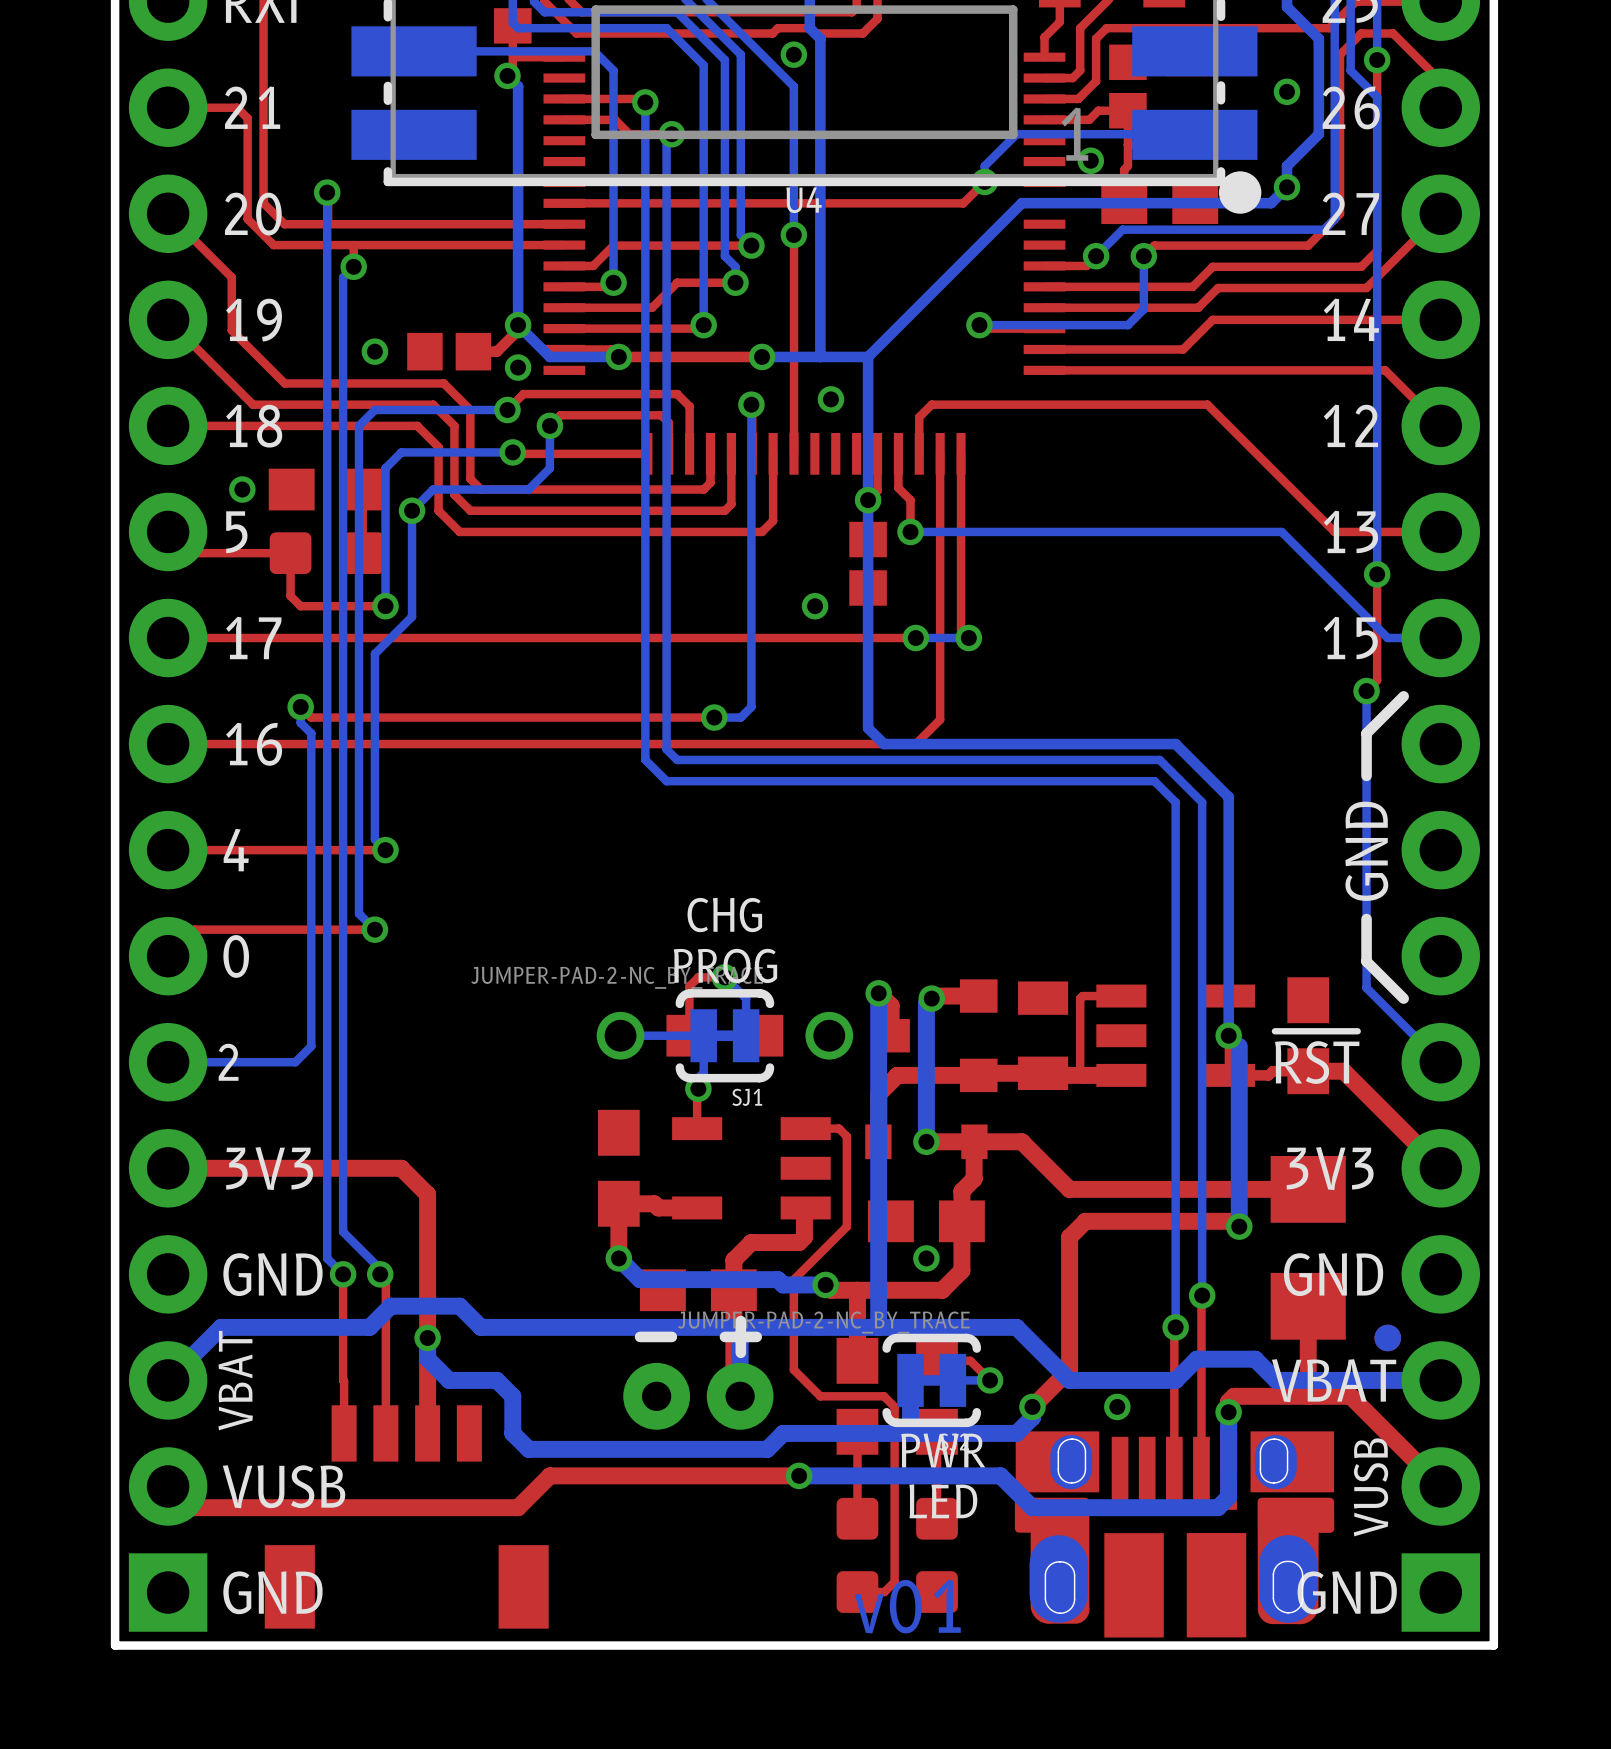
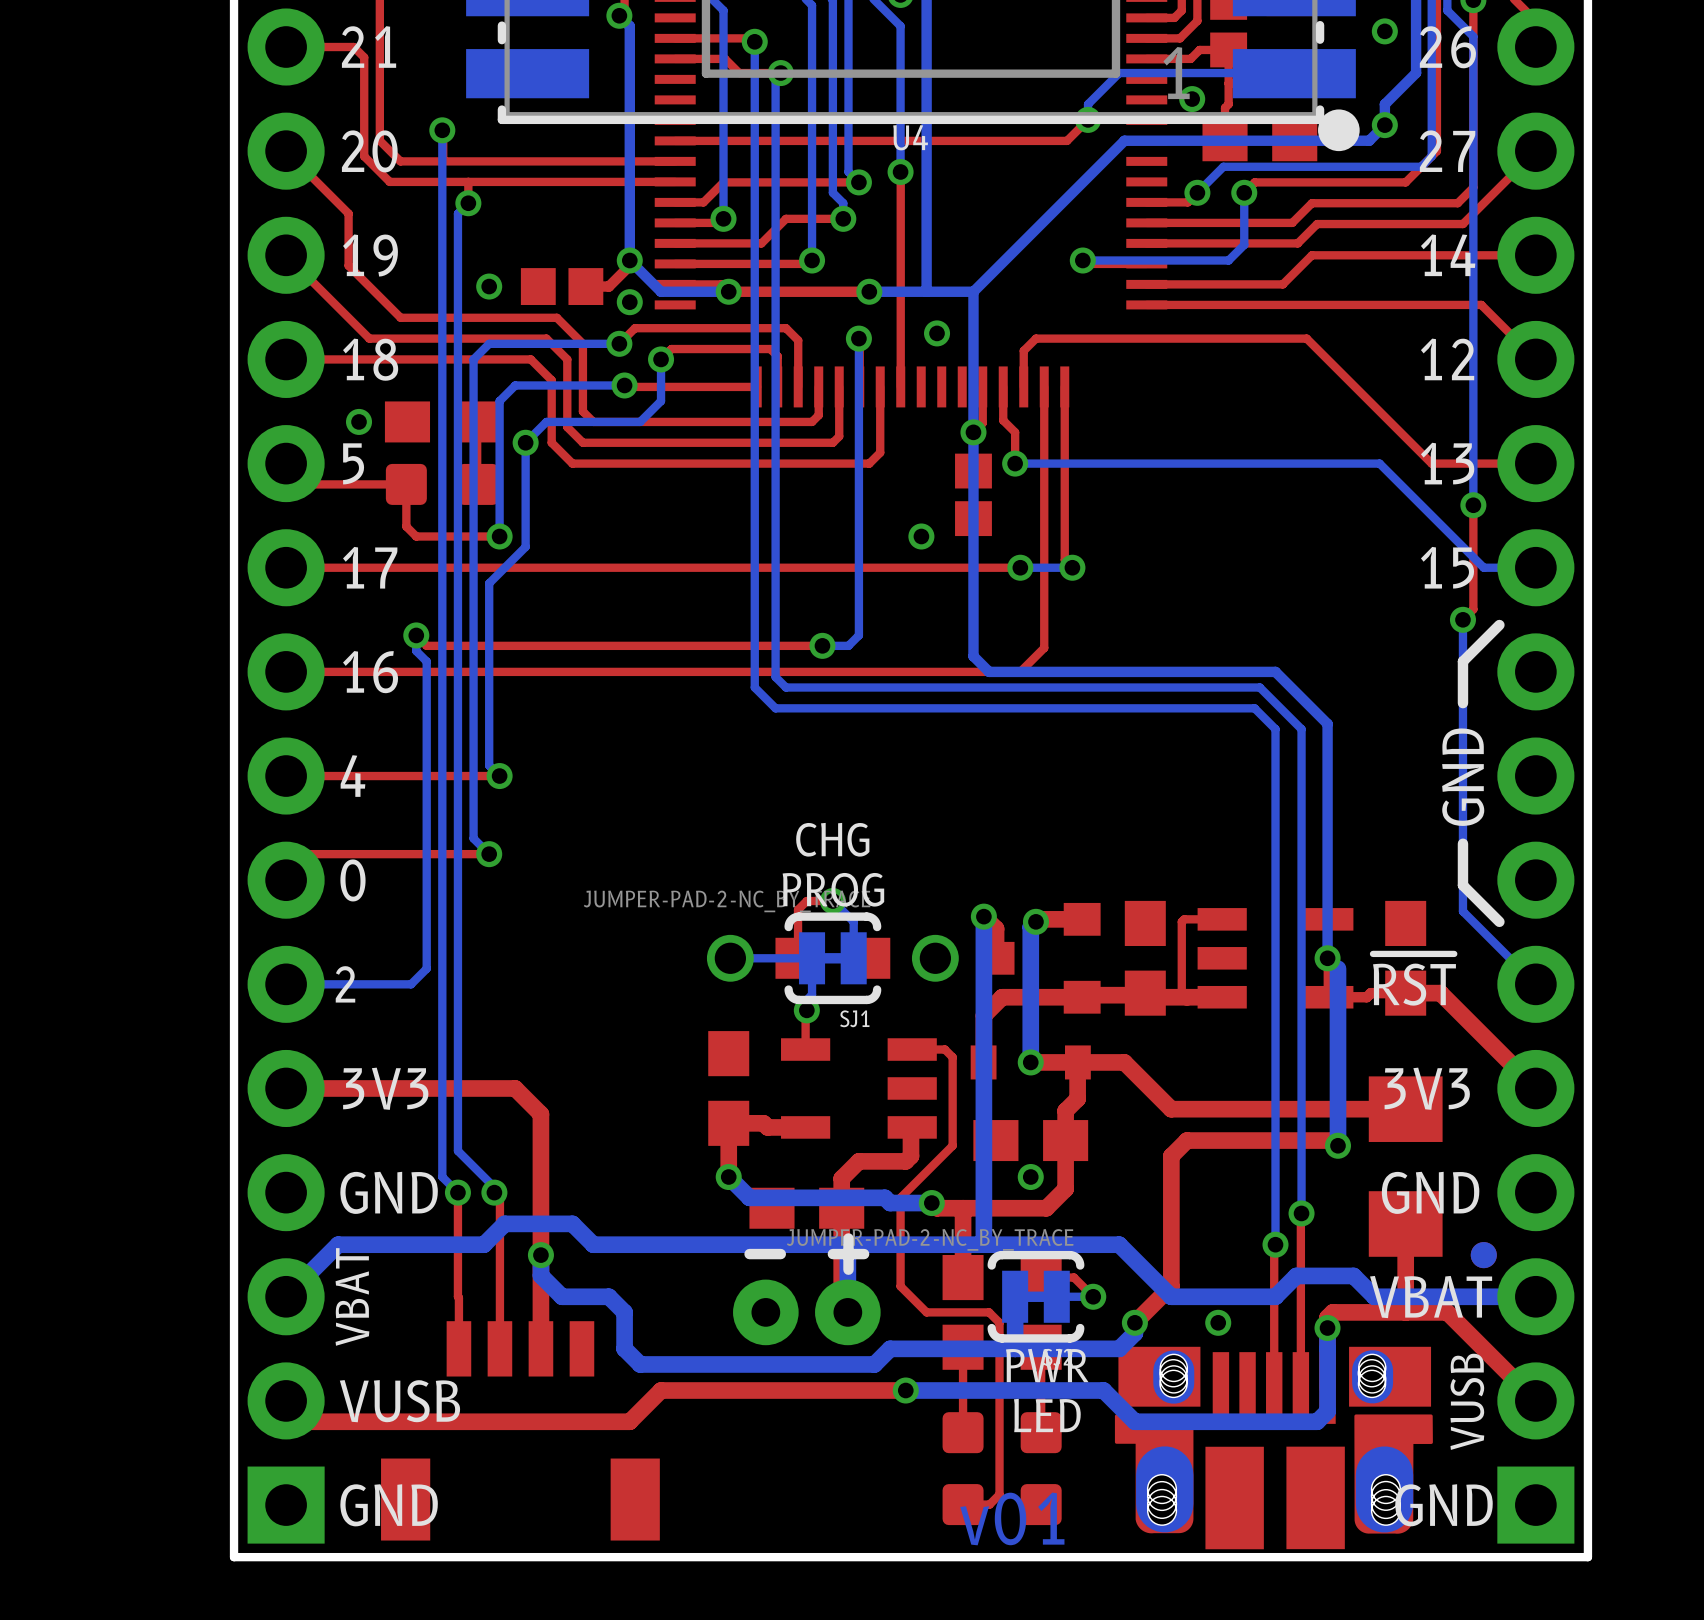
part footprint: [1018, 981, 1069, 1091] -> [1124, 900, 1166, 1016]
part footprint: [1014, 1431, 1335, 1638] -> [1114, 1346, 1433, 1550]

